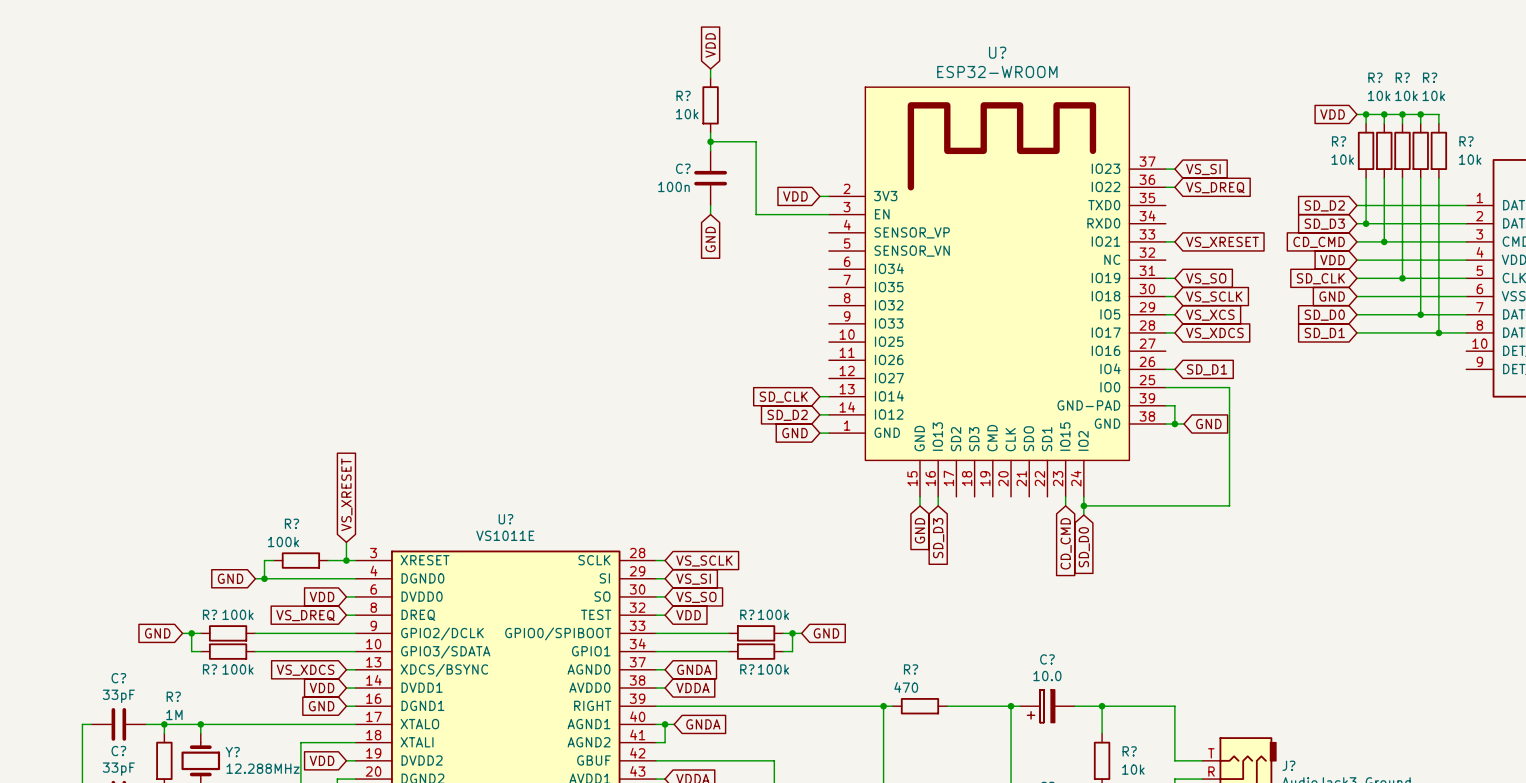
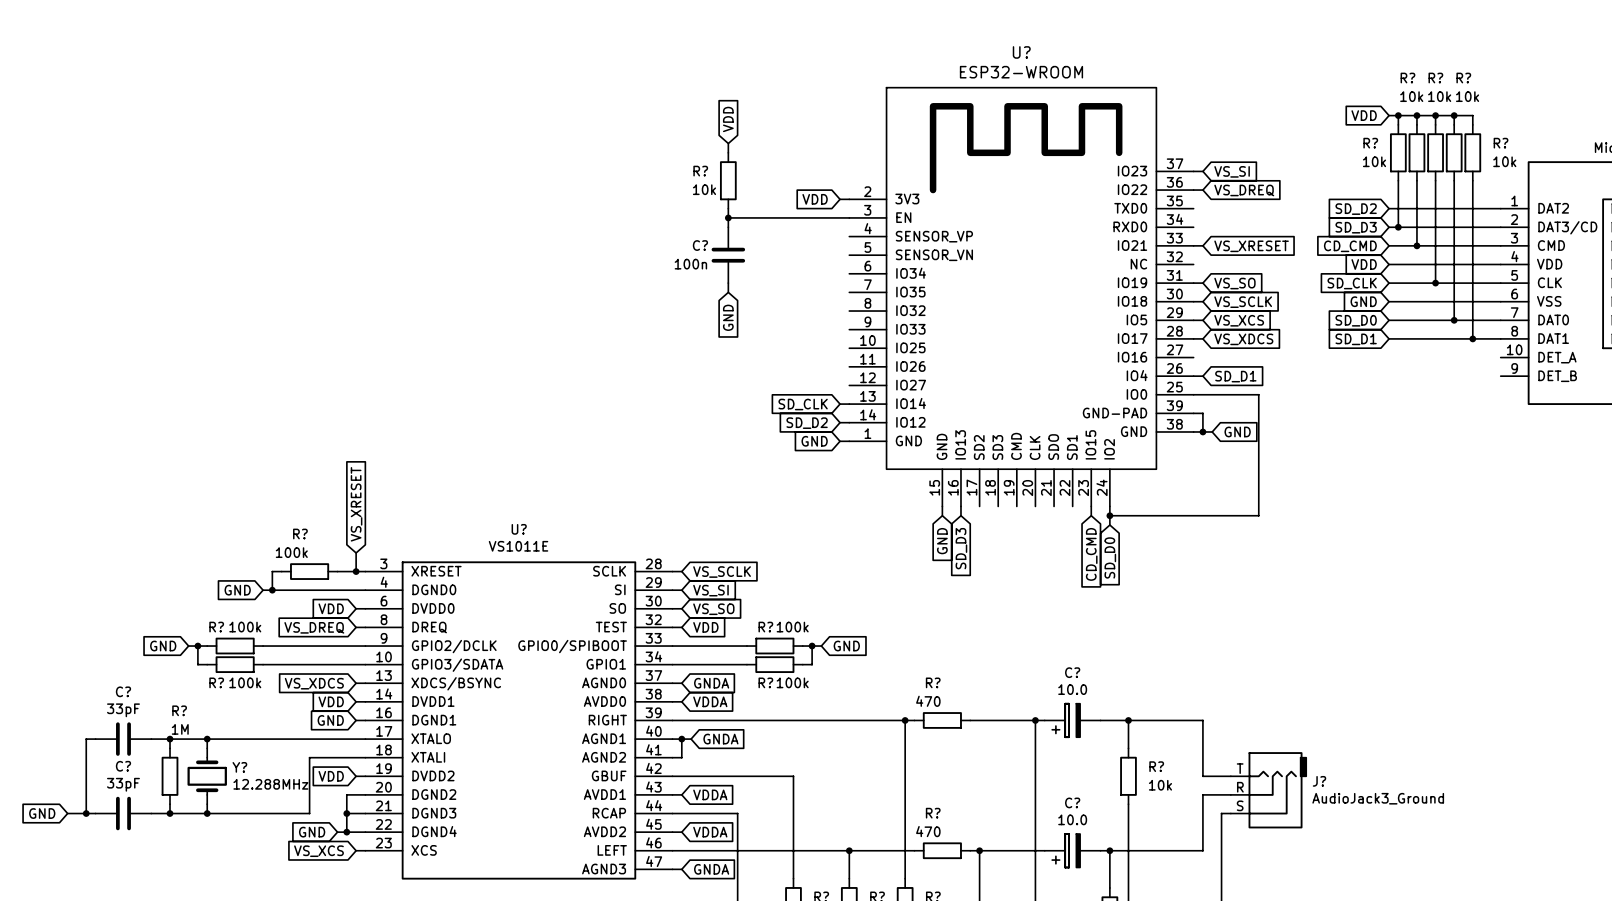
global label position: VDD (710, 45) -> VDD (728, 119)
wire: (710, 68) (710, 78) -> none
R? position: (710, 105) -> (728, 180)
wire: (710, 132) (710, 141) (756, 141) (756, 214) -> (728, 227) (728, 217) (774, 217)
junction: (710, 141) -> none
C? position: (710, 178) -> (728, 255)
junction: none -> (728, 217)
global label position: GND (710, 239) -> GND (728, 317)
wire: none -> (728, 283) (728, 292)

